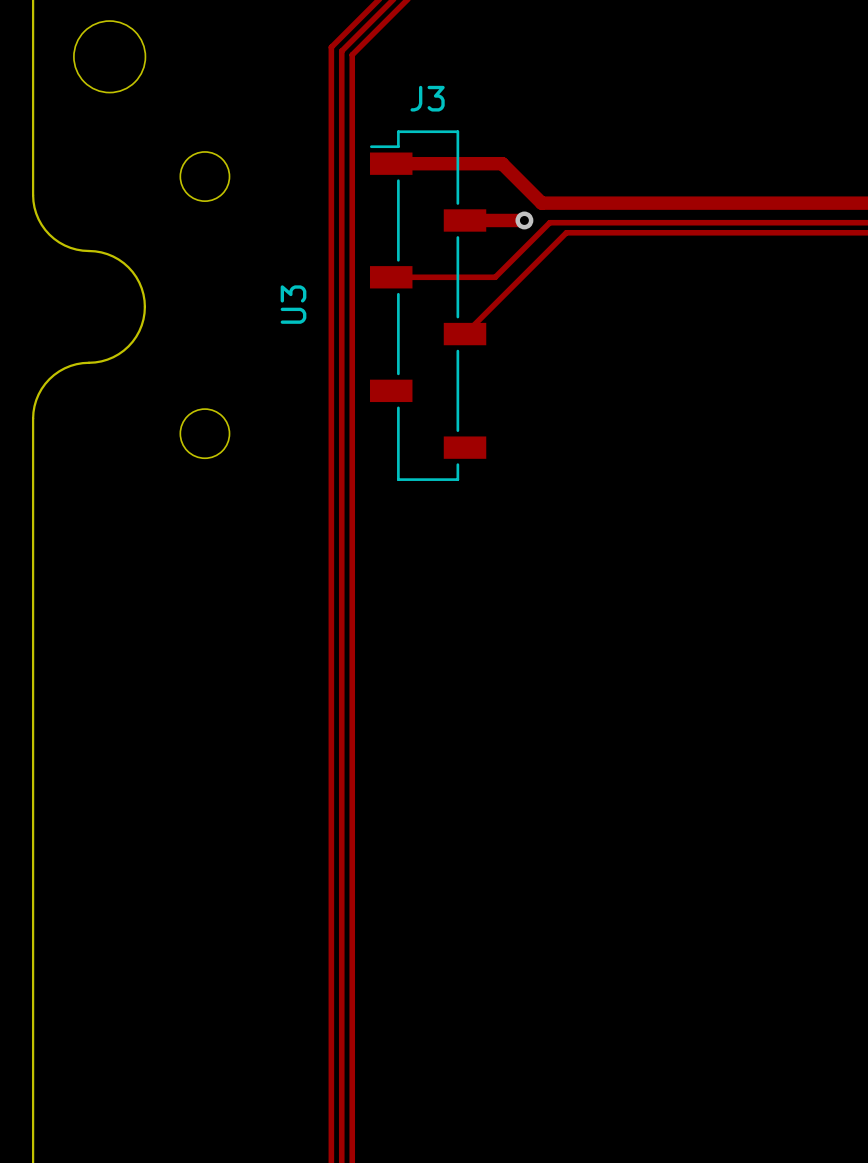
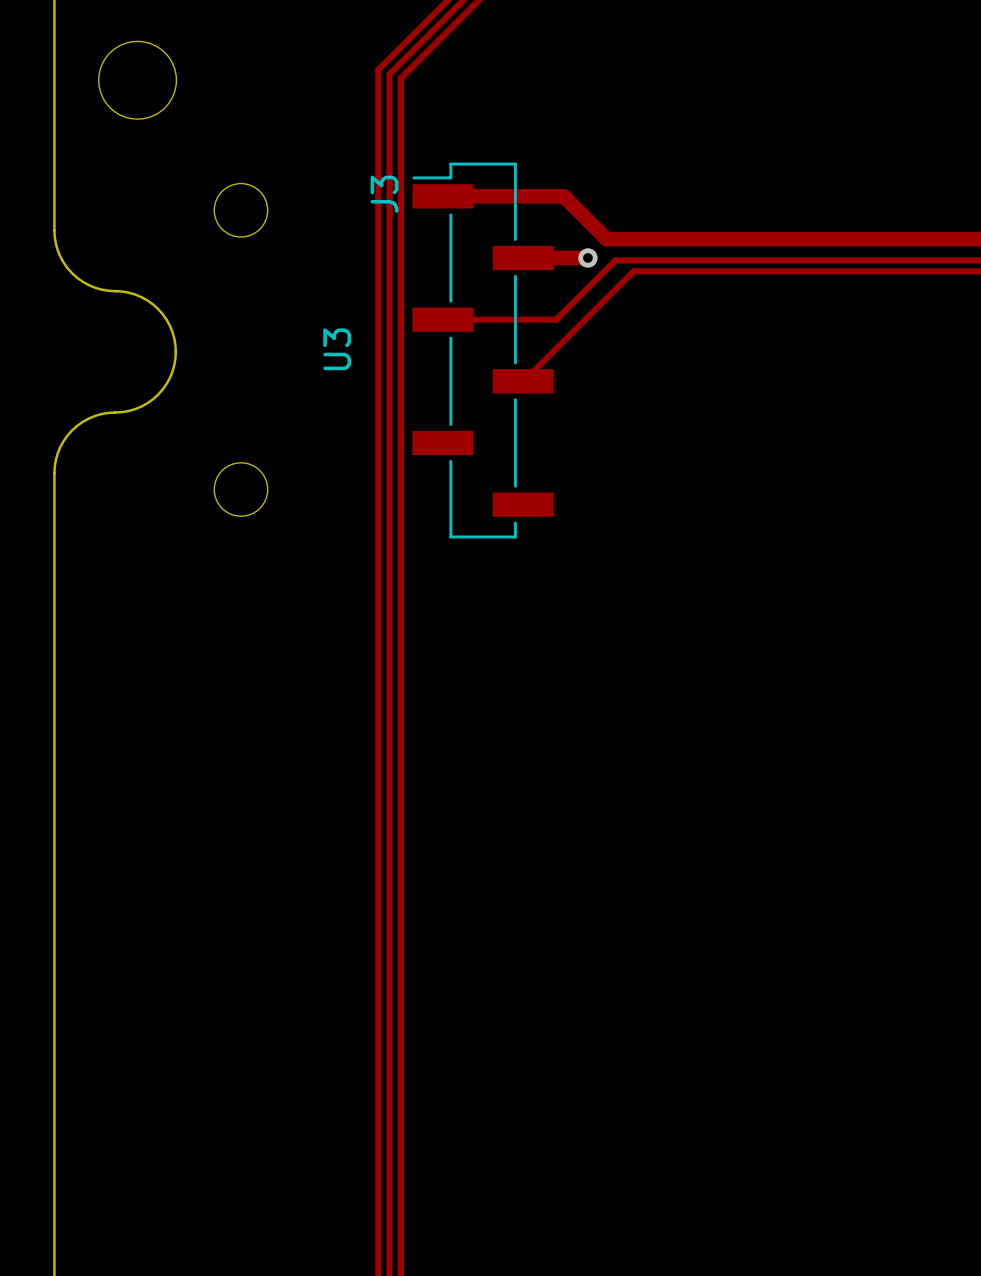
J3 name rotation: 0° (427, 98) -> 90° counterclockwise (384, 194)
J3 name position: J3 (427, 98) -> J3 (384, 194)
J3 footprint: [369, 130, 487, 481] -> [412, 162, 554, 539]

